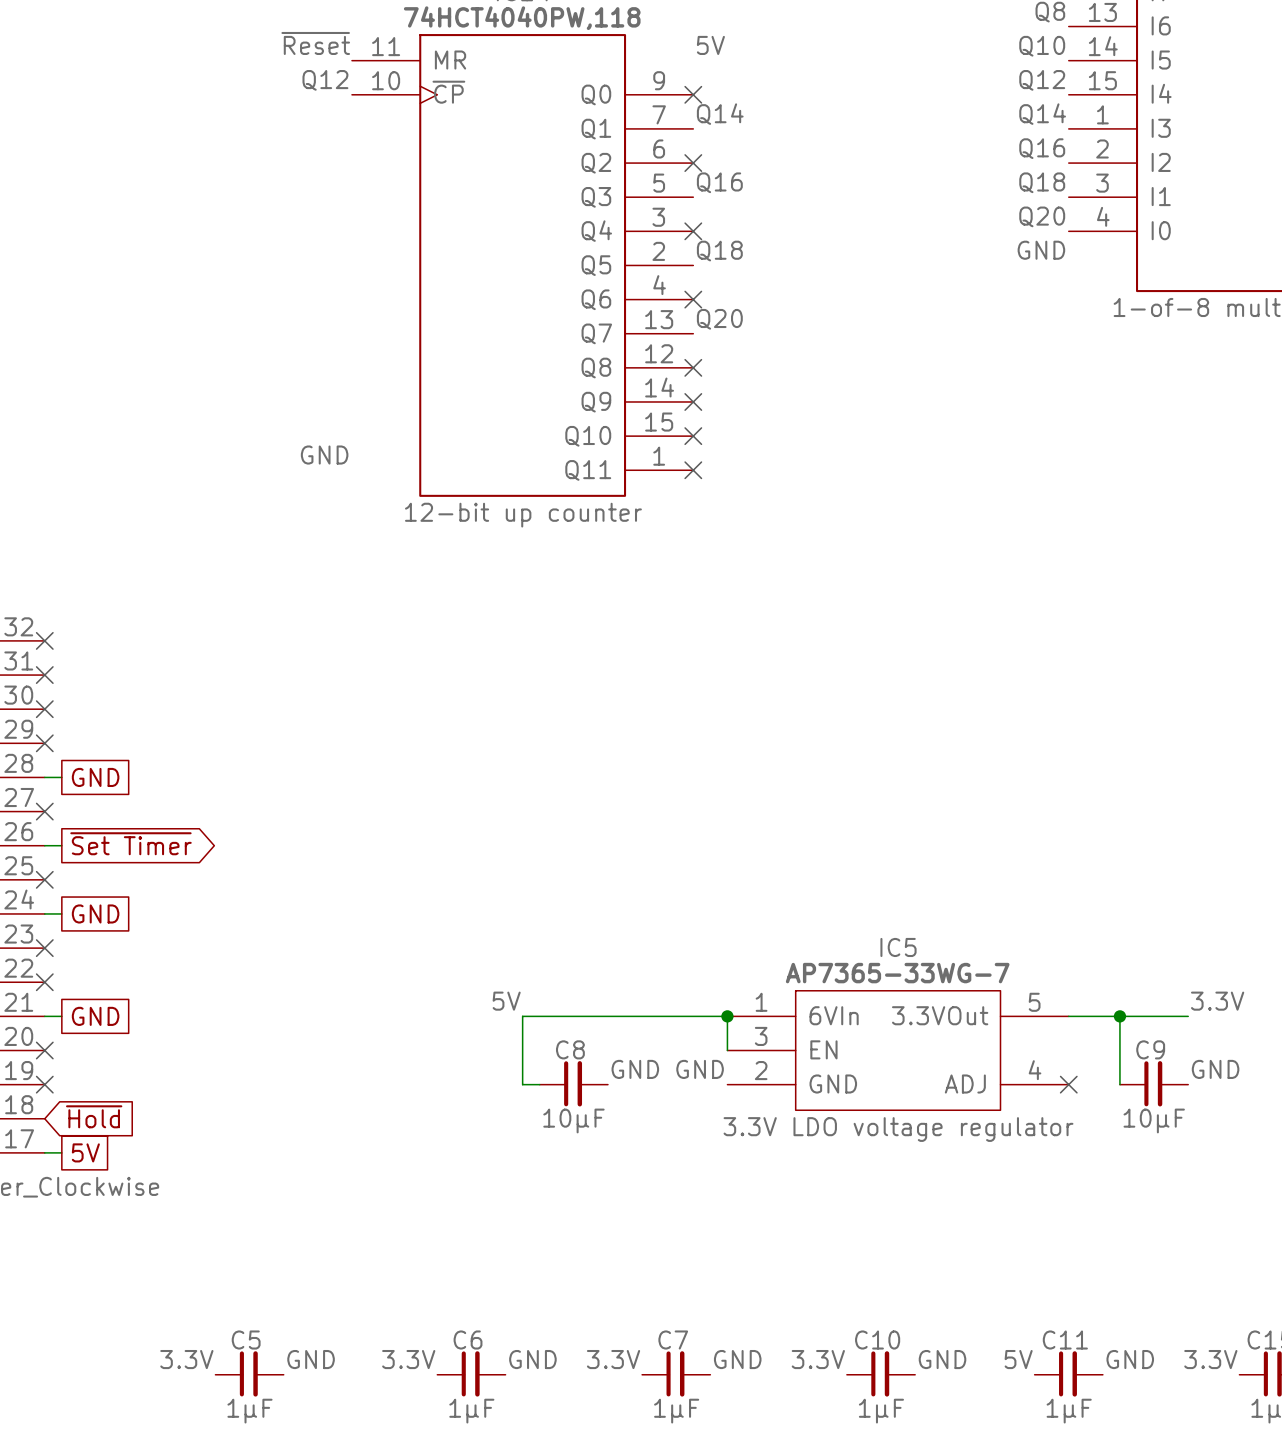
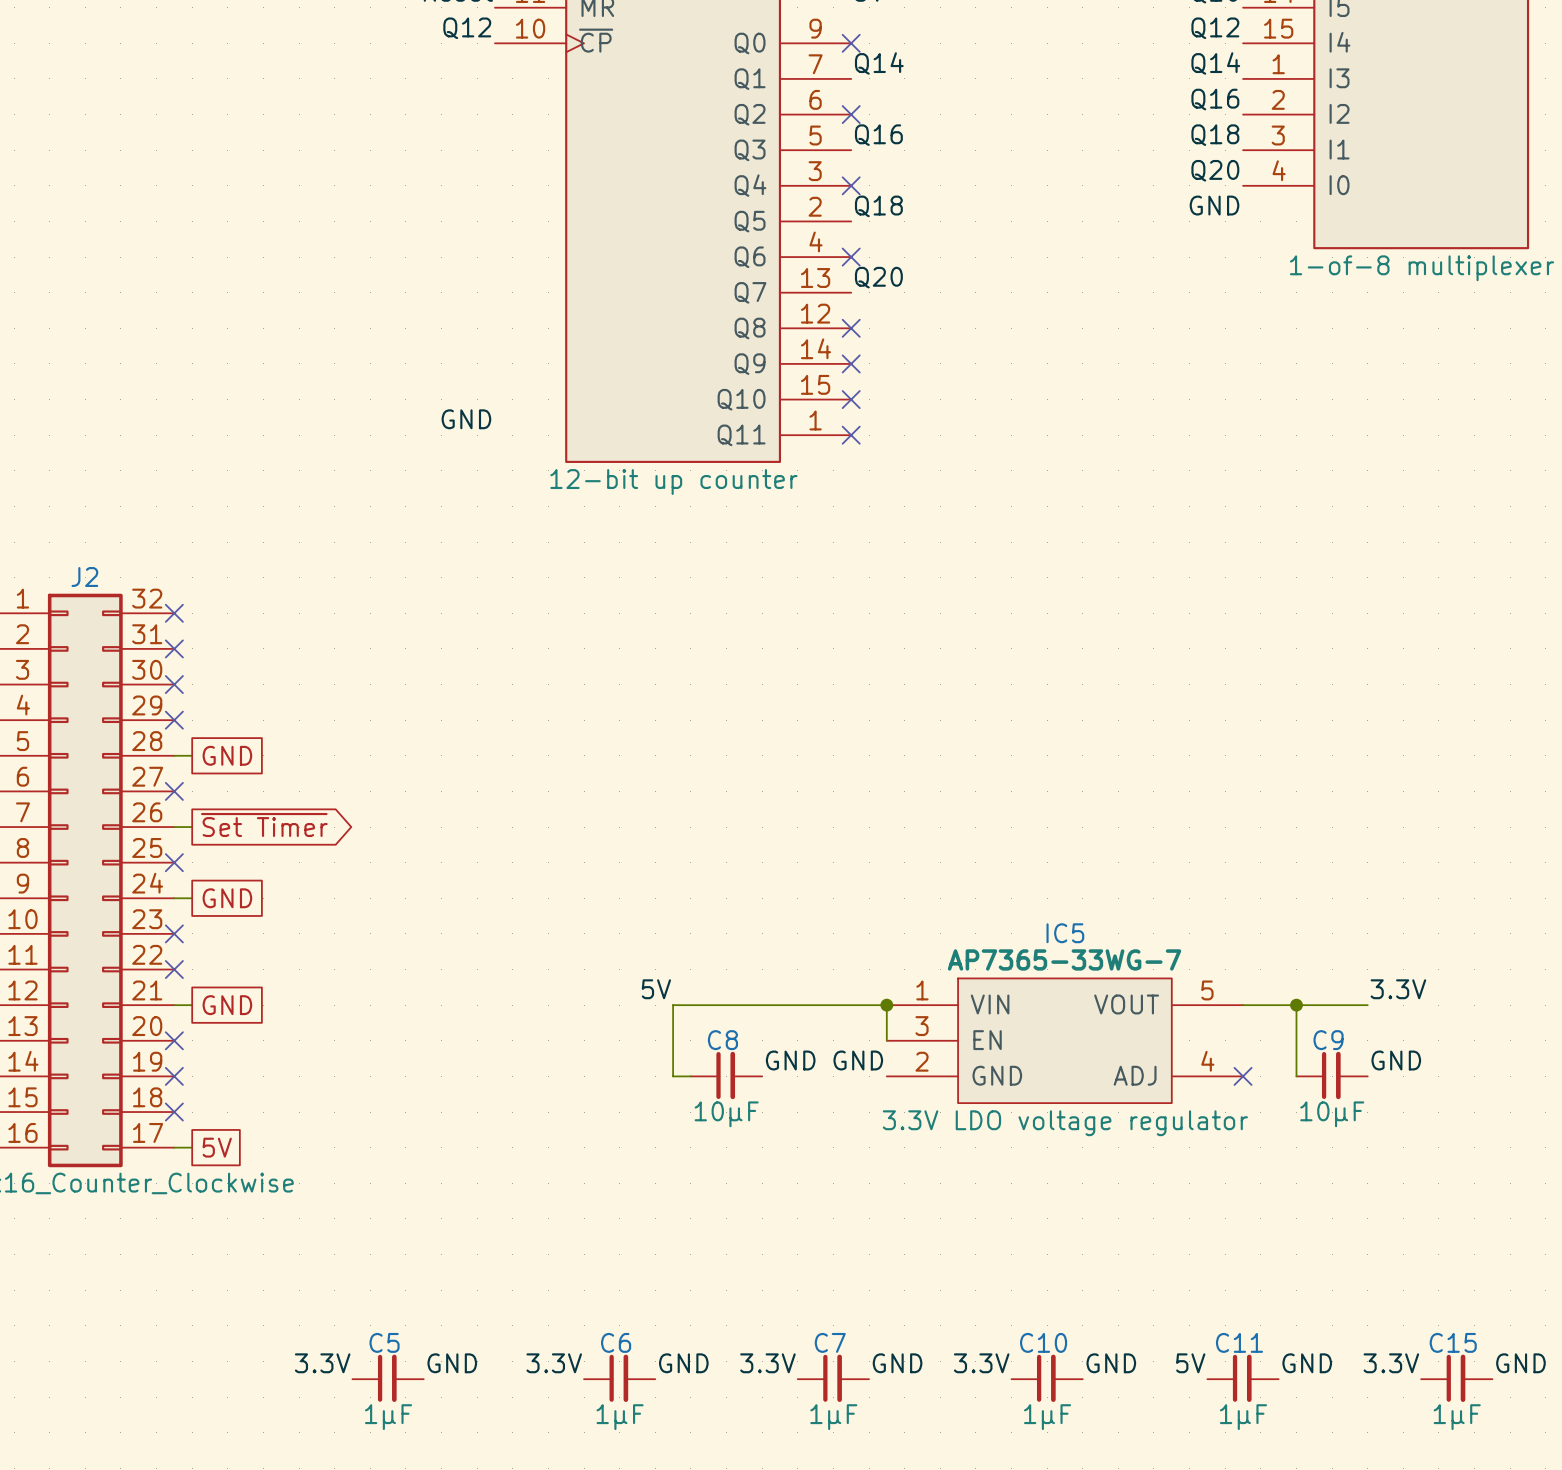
IC5 pin name: 6VIn (834, 1015) -> VIN (990, 1004)
IC5 pin name: 3.3VOut (940, 1015) -> VOUT (1126, 1004)
global label: ~{Hold} (94, 1116) -> none
no-connect mark: none -> (174, 1112)

